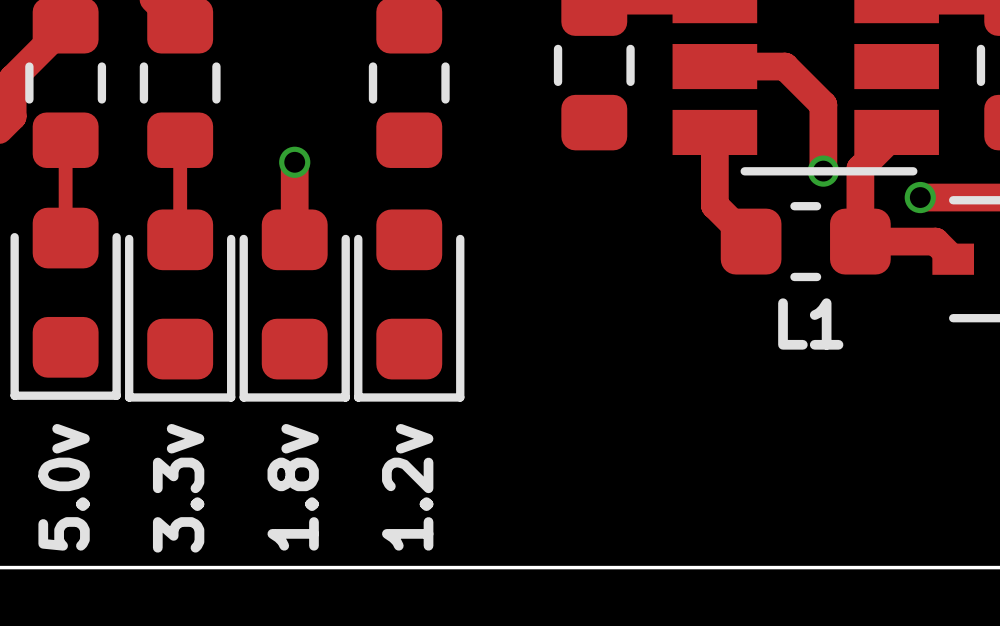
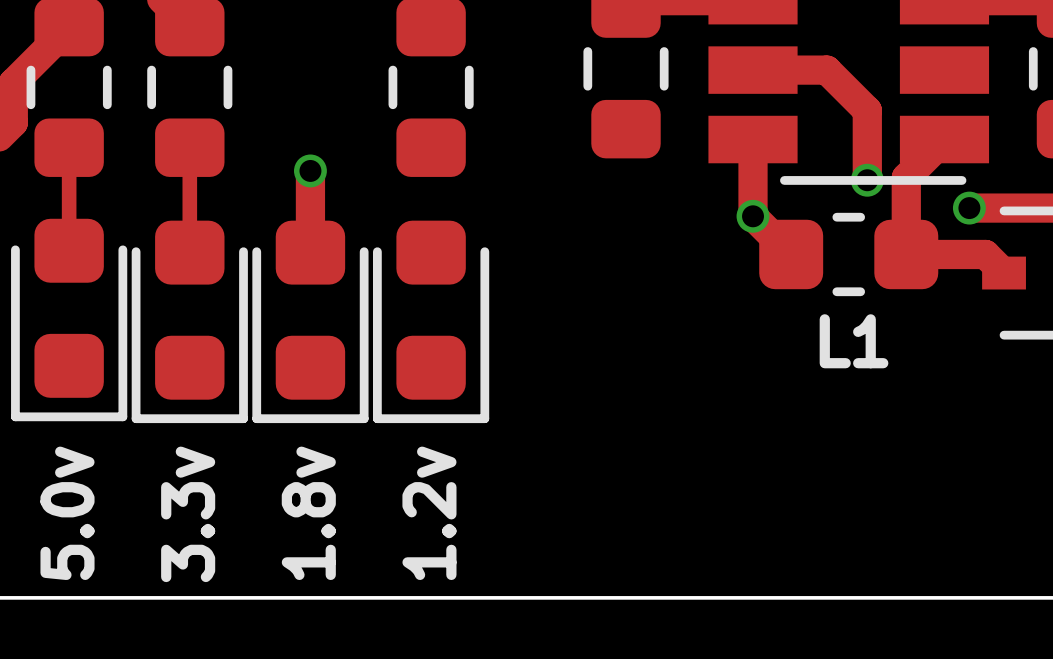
via: none -> (753, 216)

